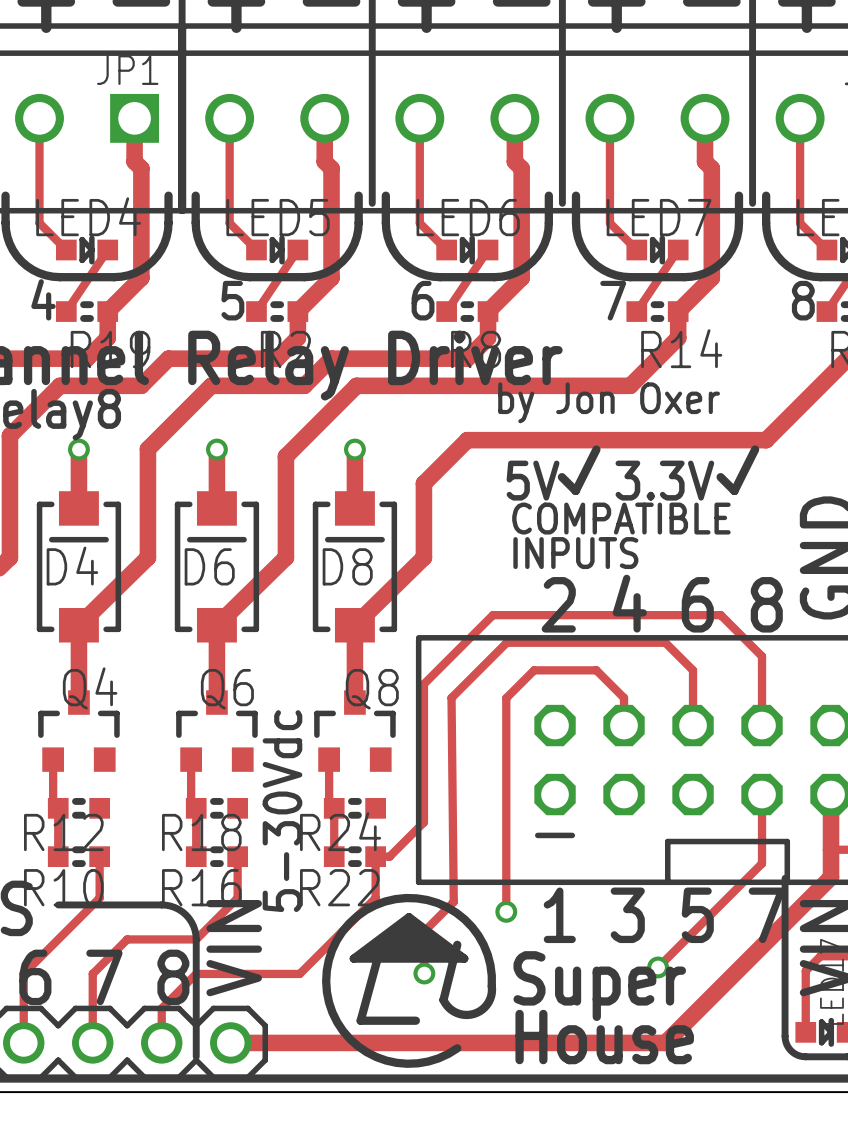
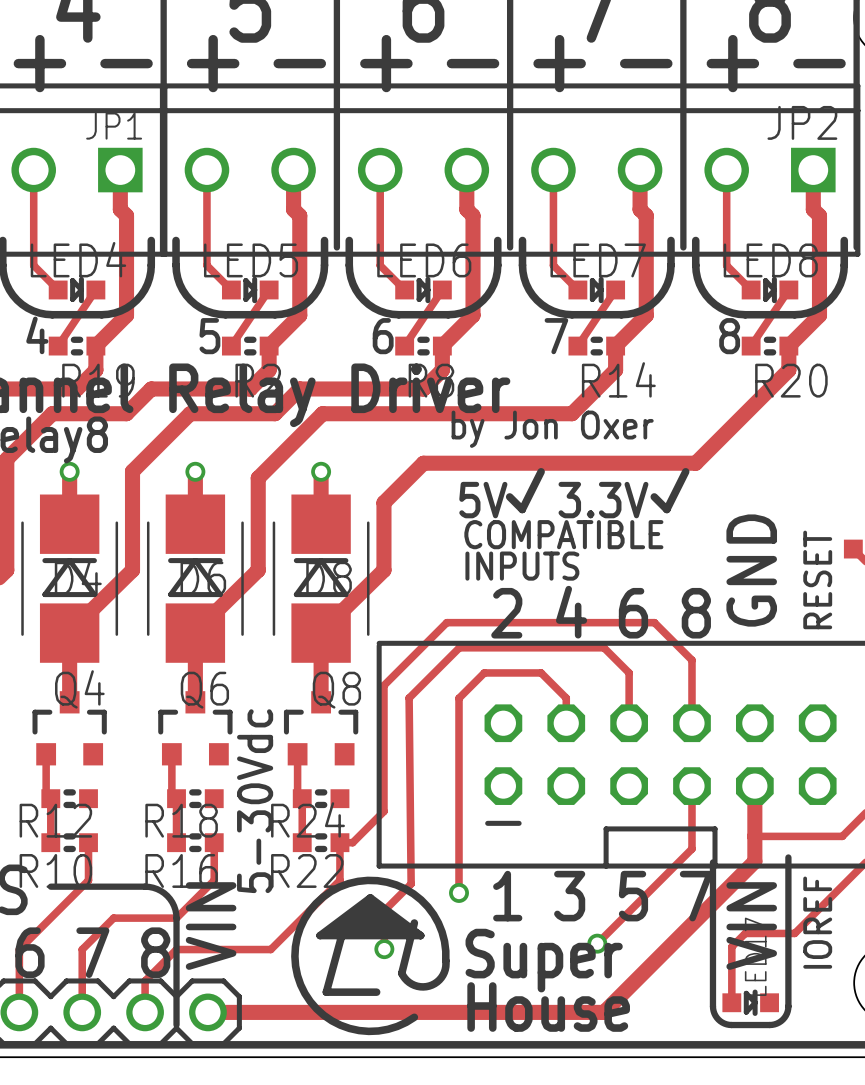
D4 footprint: [36, 491, 122, 643] -> [21, 494, 119, 663]
D6 footprint: [174, 491, 260, 643] -> [146, 494, 244, 663]
D8 footprint: [312, 491, 398, 643] -> [272, 494, 370, 663]

